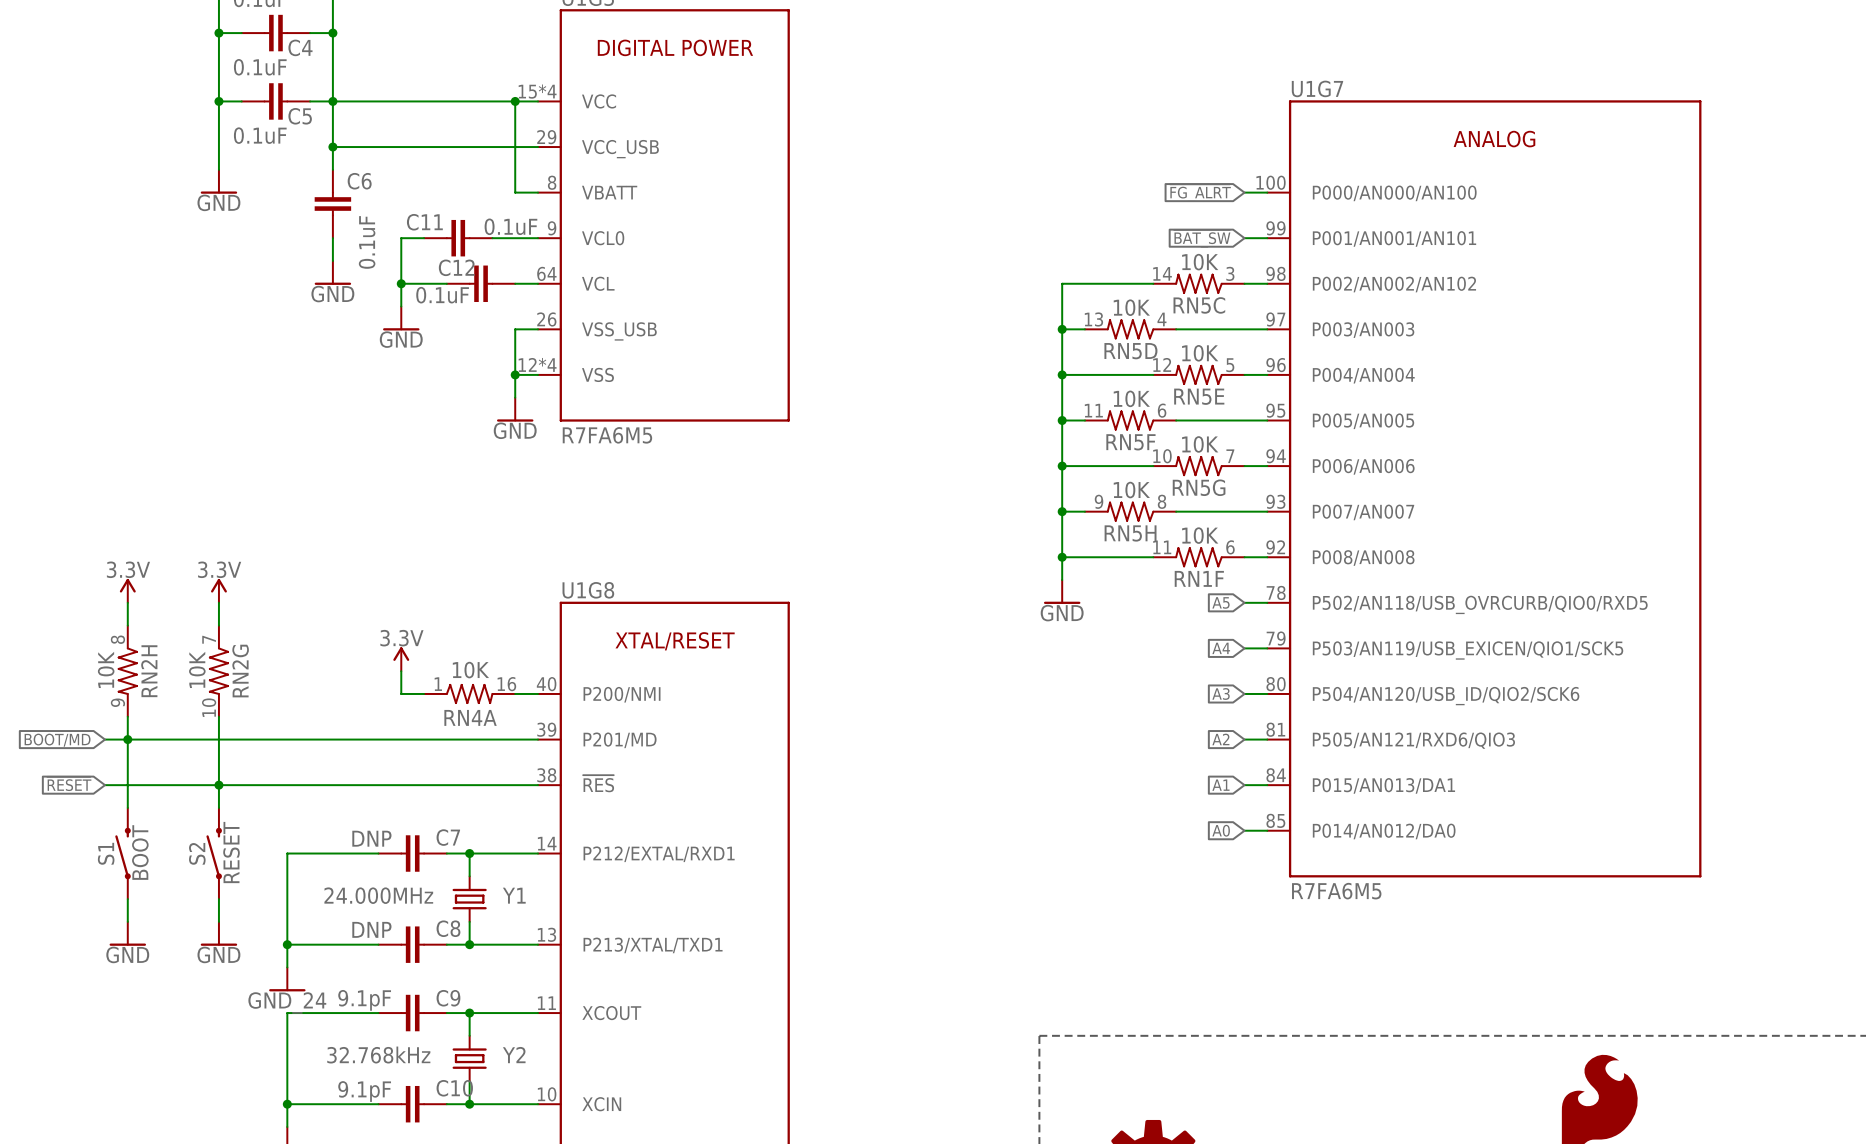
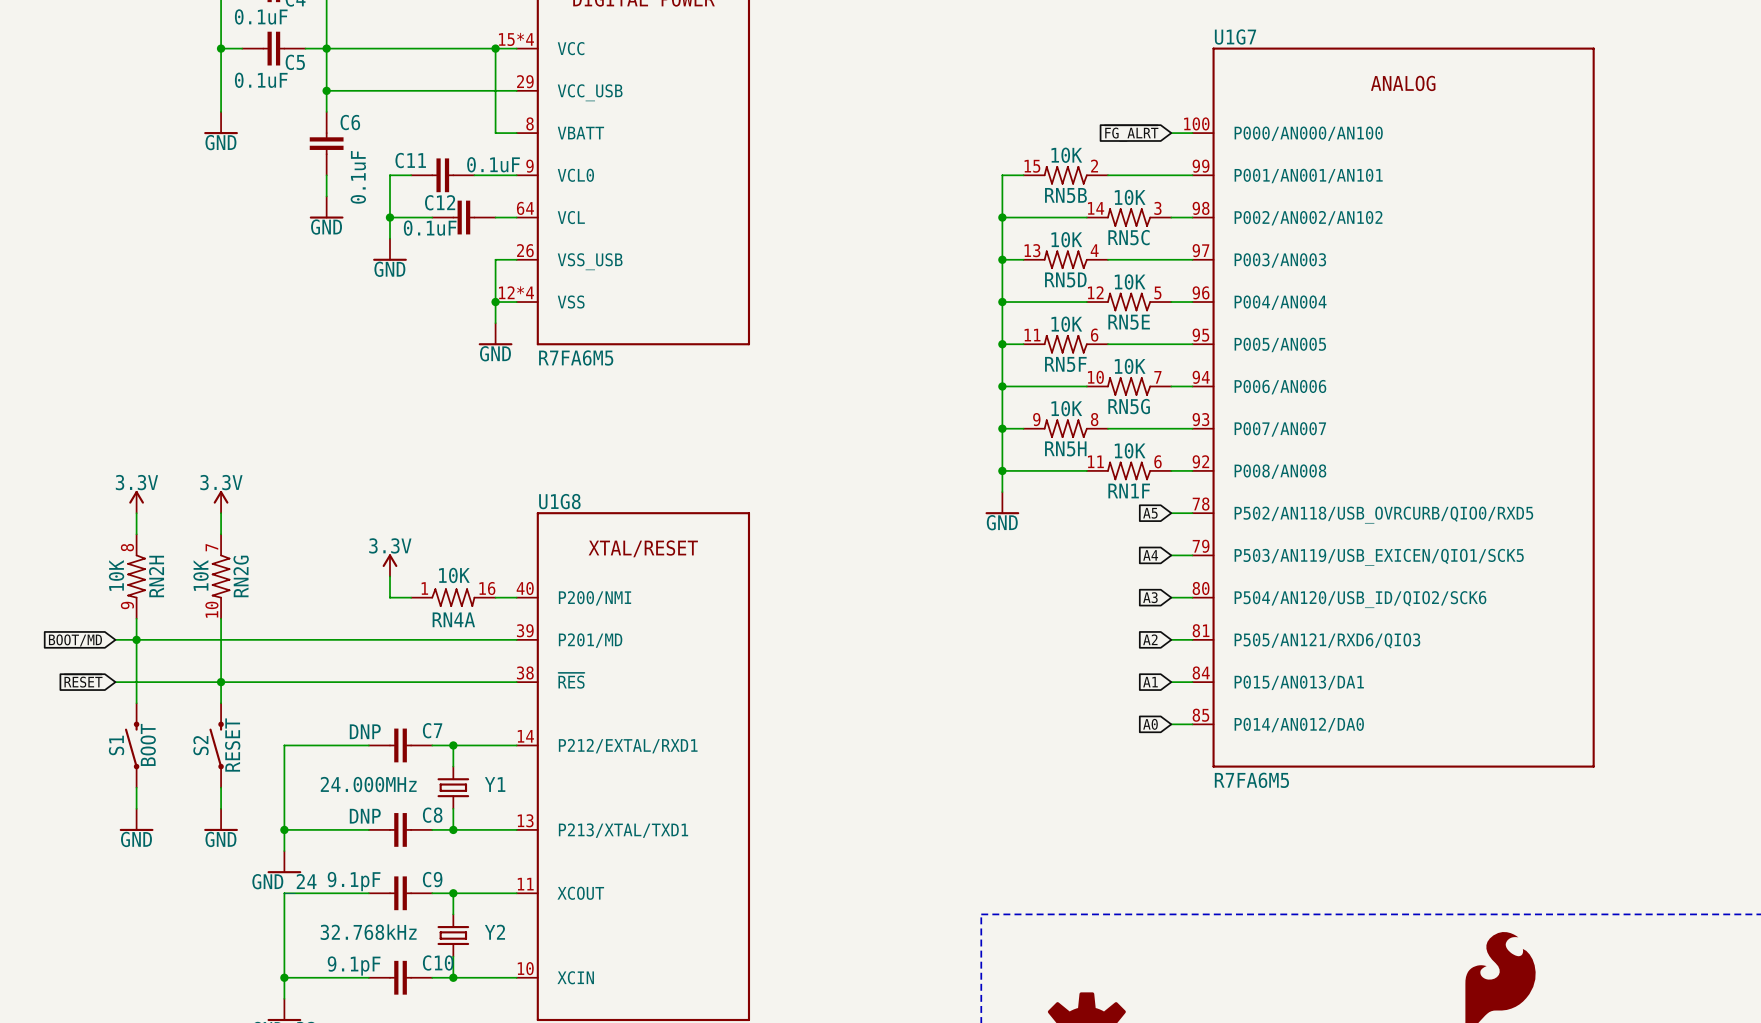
wire: none -> (1023, 175) (1002, 175) (1002, 217)
RN5B: none -> 10K (1065, 175)
wire: none -> (1107, 175) (1171, 175)
global label: ~{BAT_SW} (1202, 238) -> none
junction: none -> (1002, 217)

